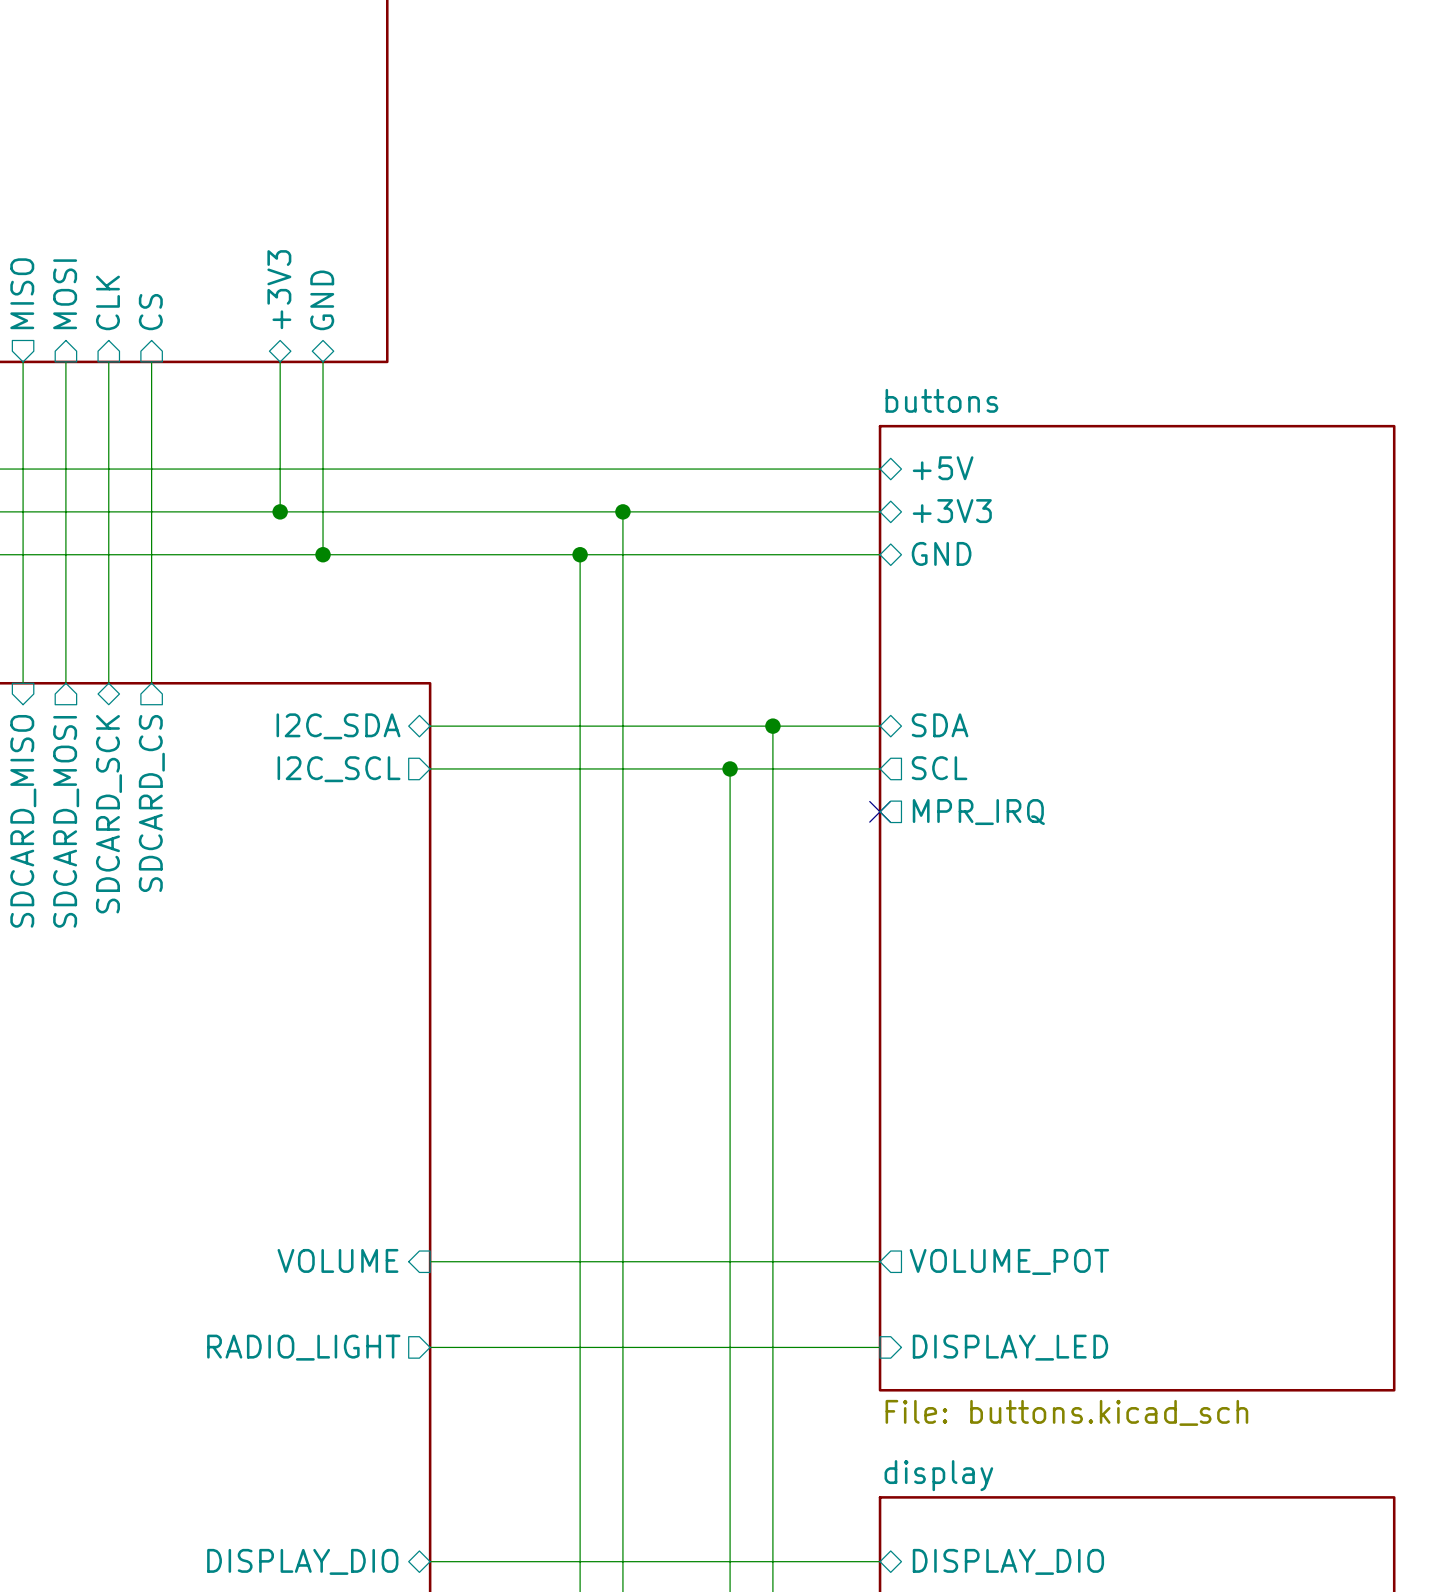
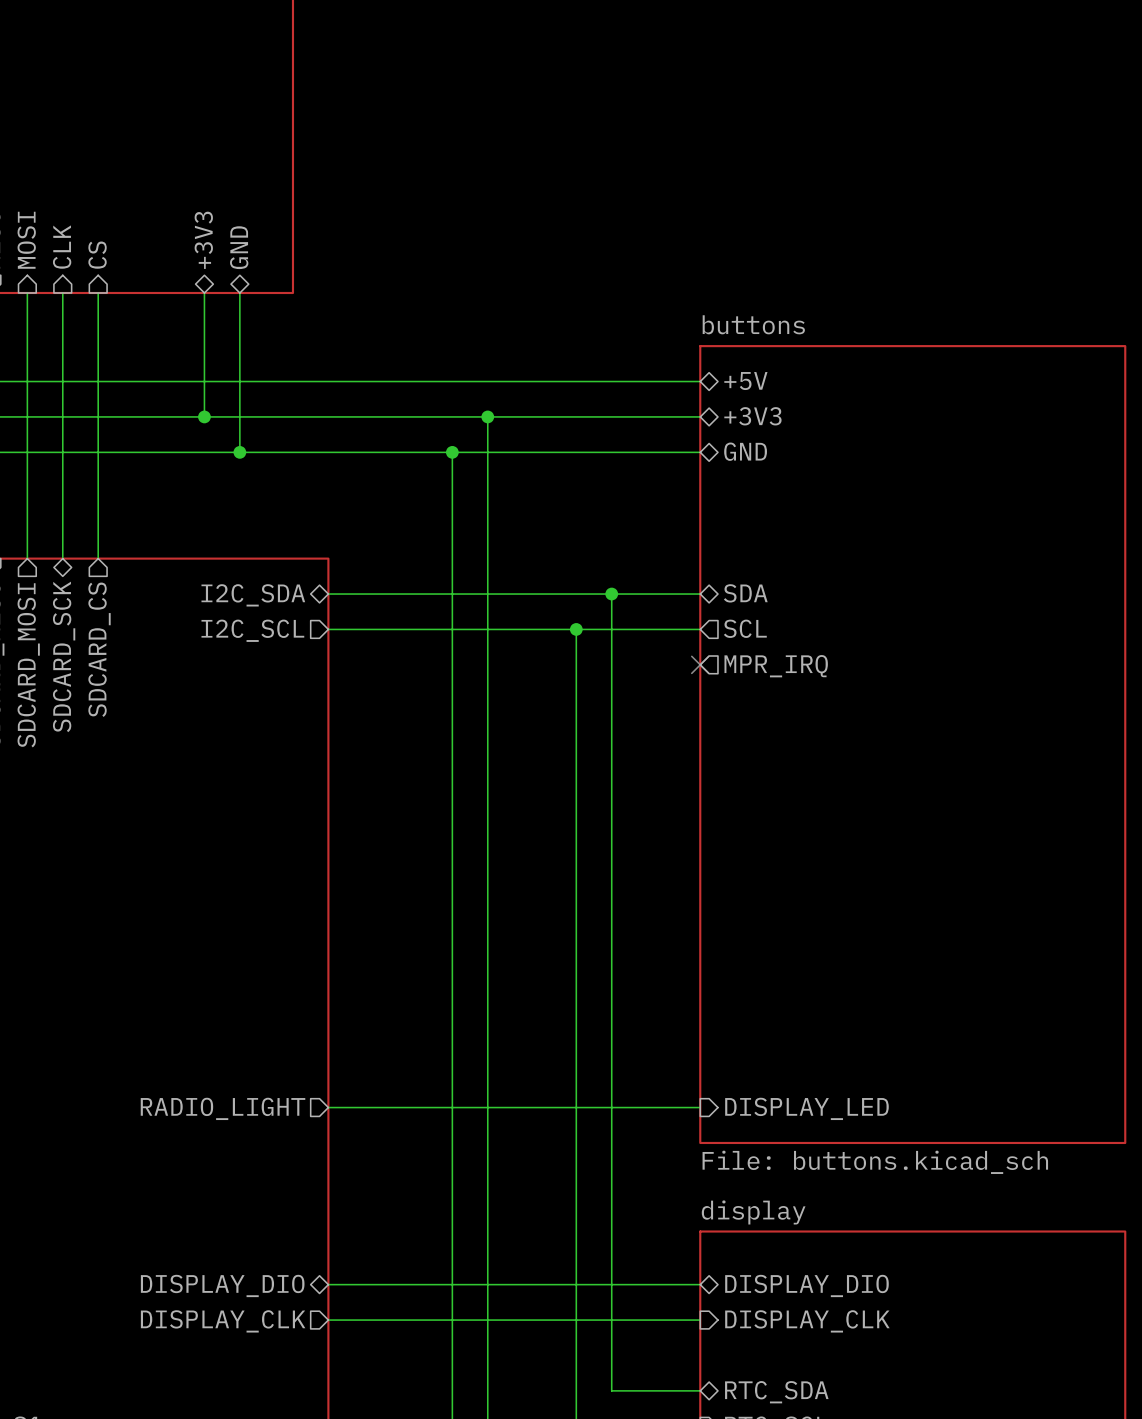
sheet pin: VOLUME (337, 1260) -> none
wire: (430, 1261) (880, 1261) -> none
sheet pin: VOLUME_POT (1009, 1261) -> none

